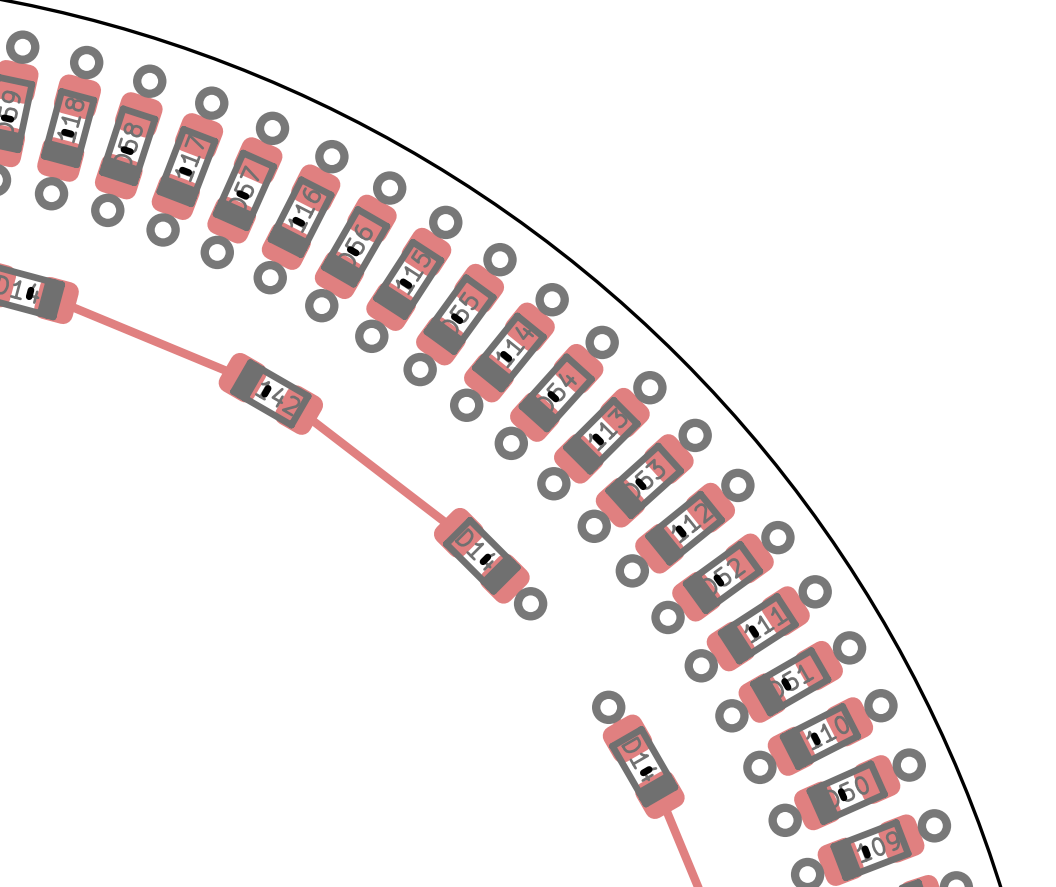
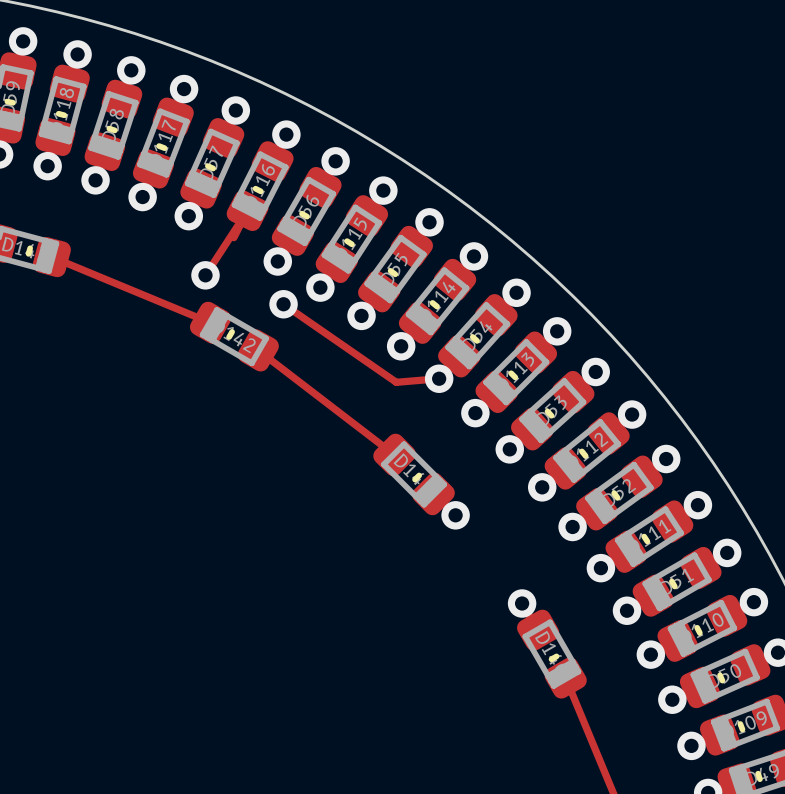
track: none -> (247, 210) (205, 275)
via: (270, 277) -> none
via: none -> (205, 275)
track: none -> (283, 304) (396, 382) (439, 378)
via: none -> (283, 304)

